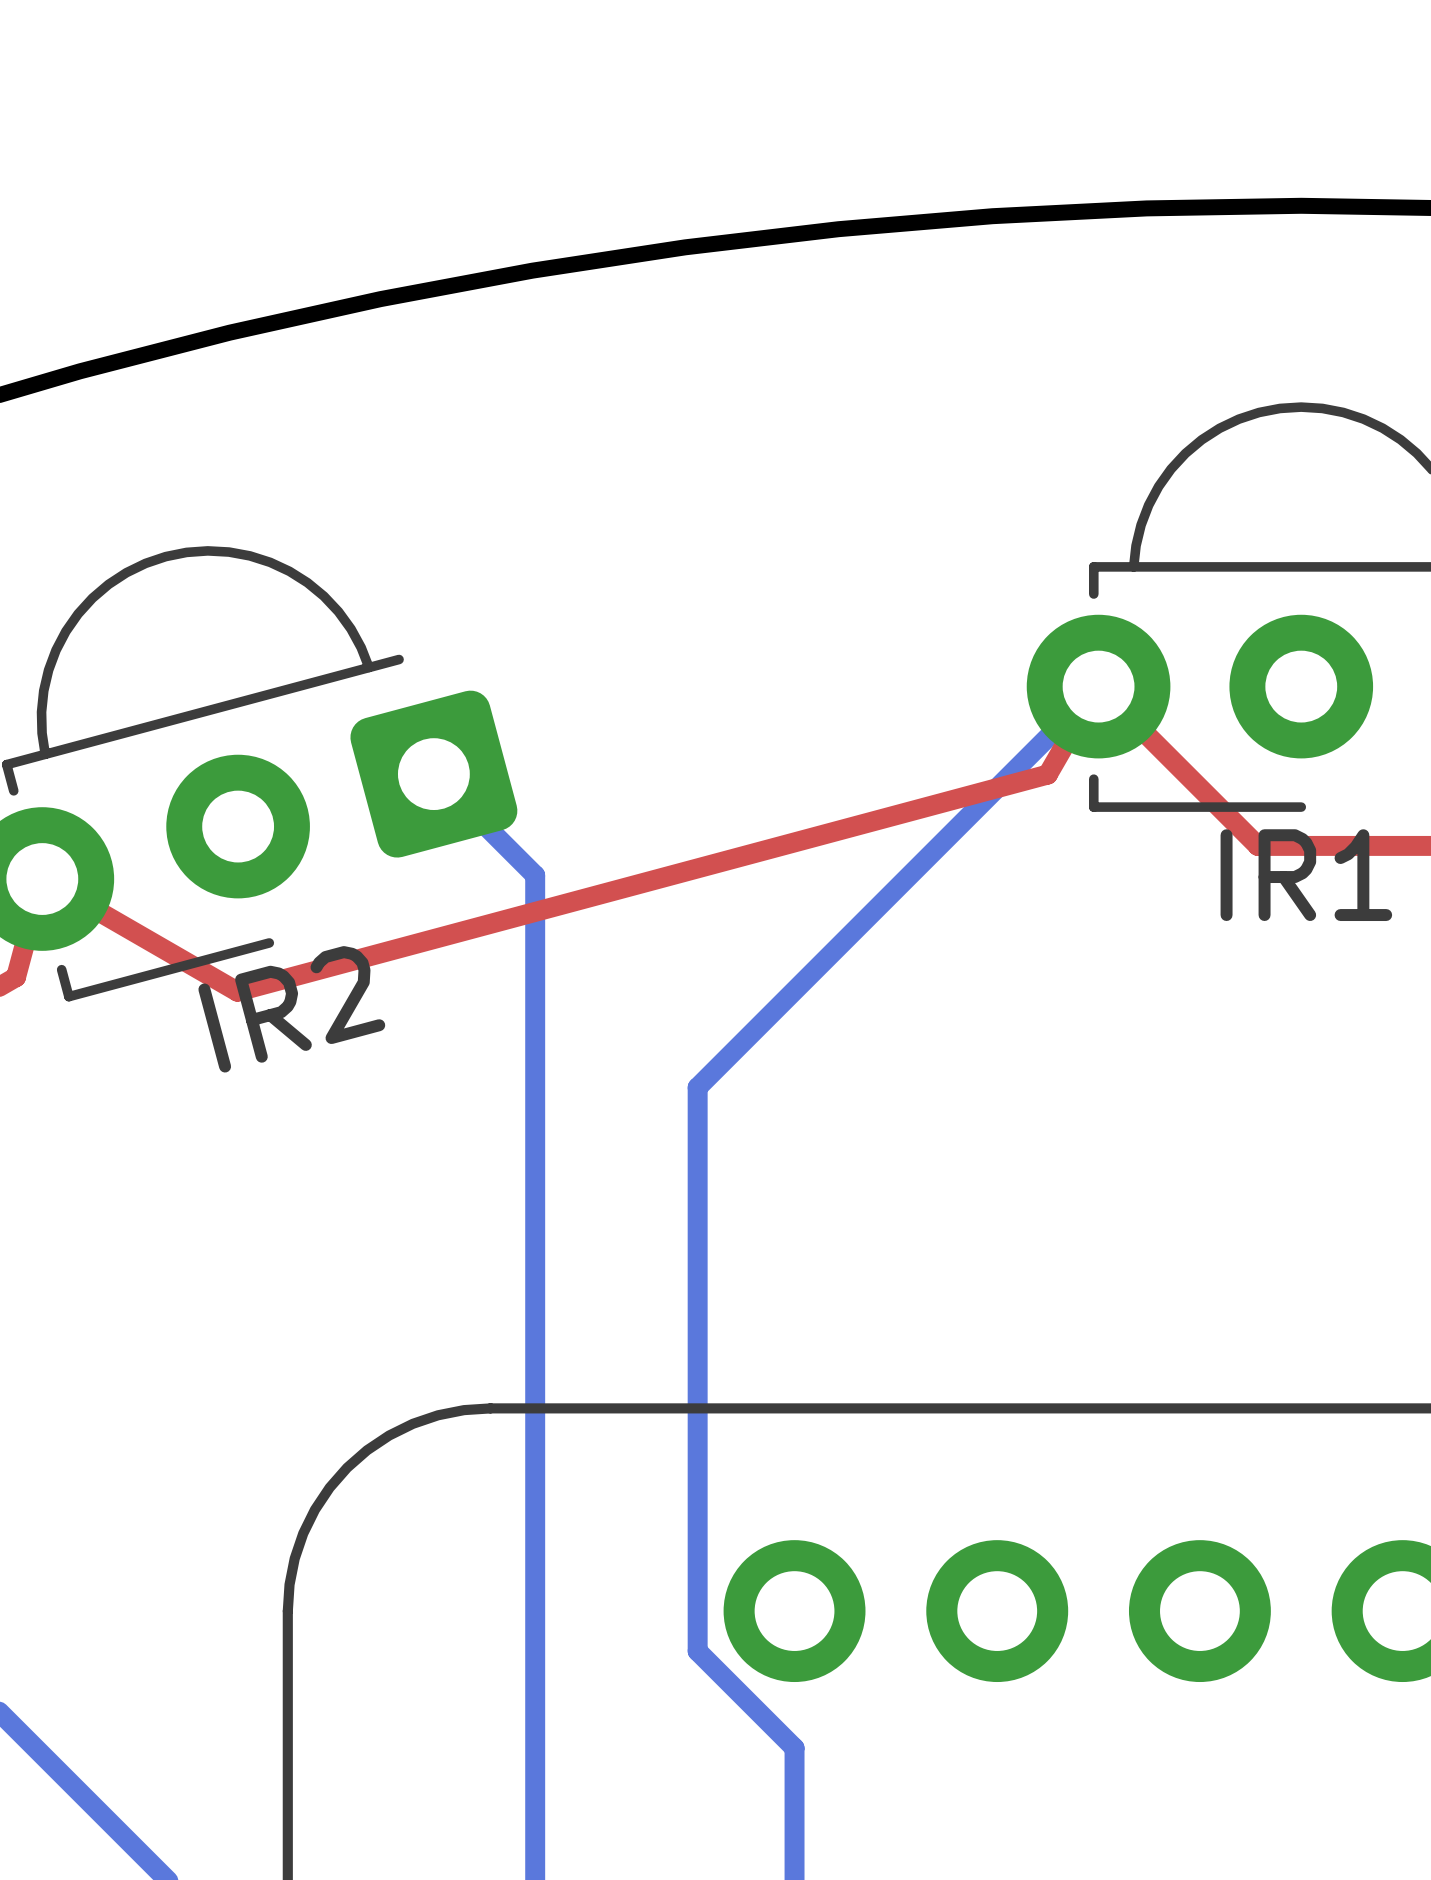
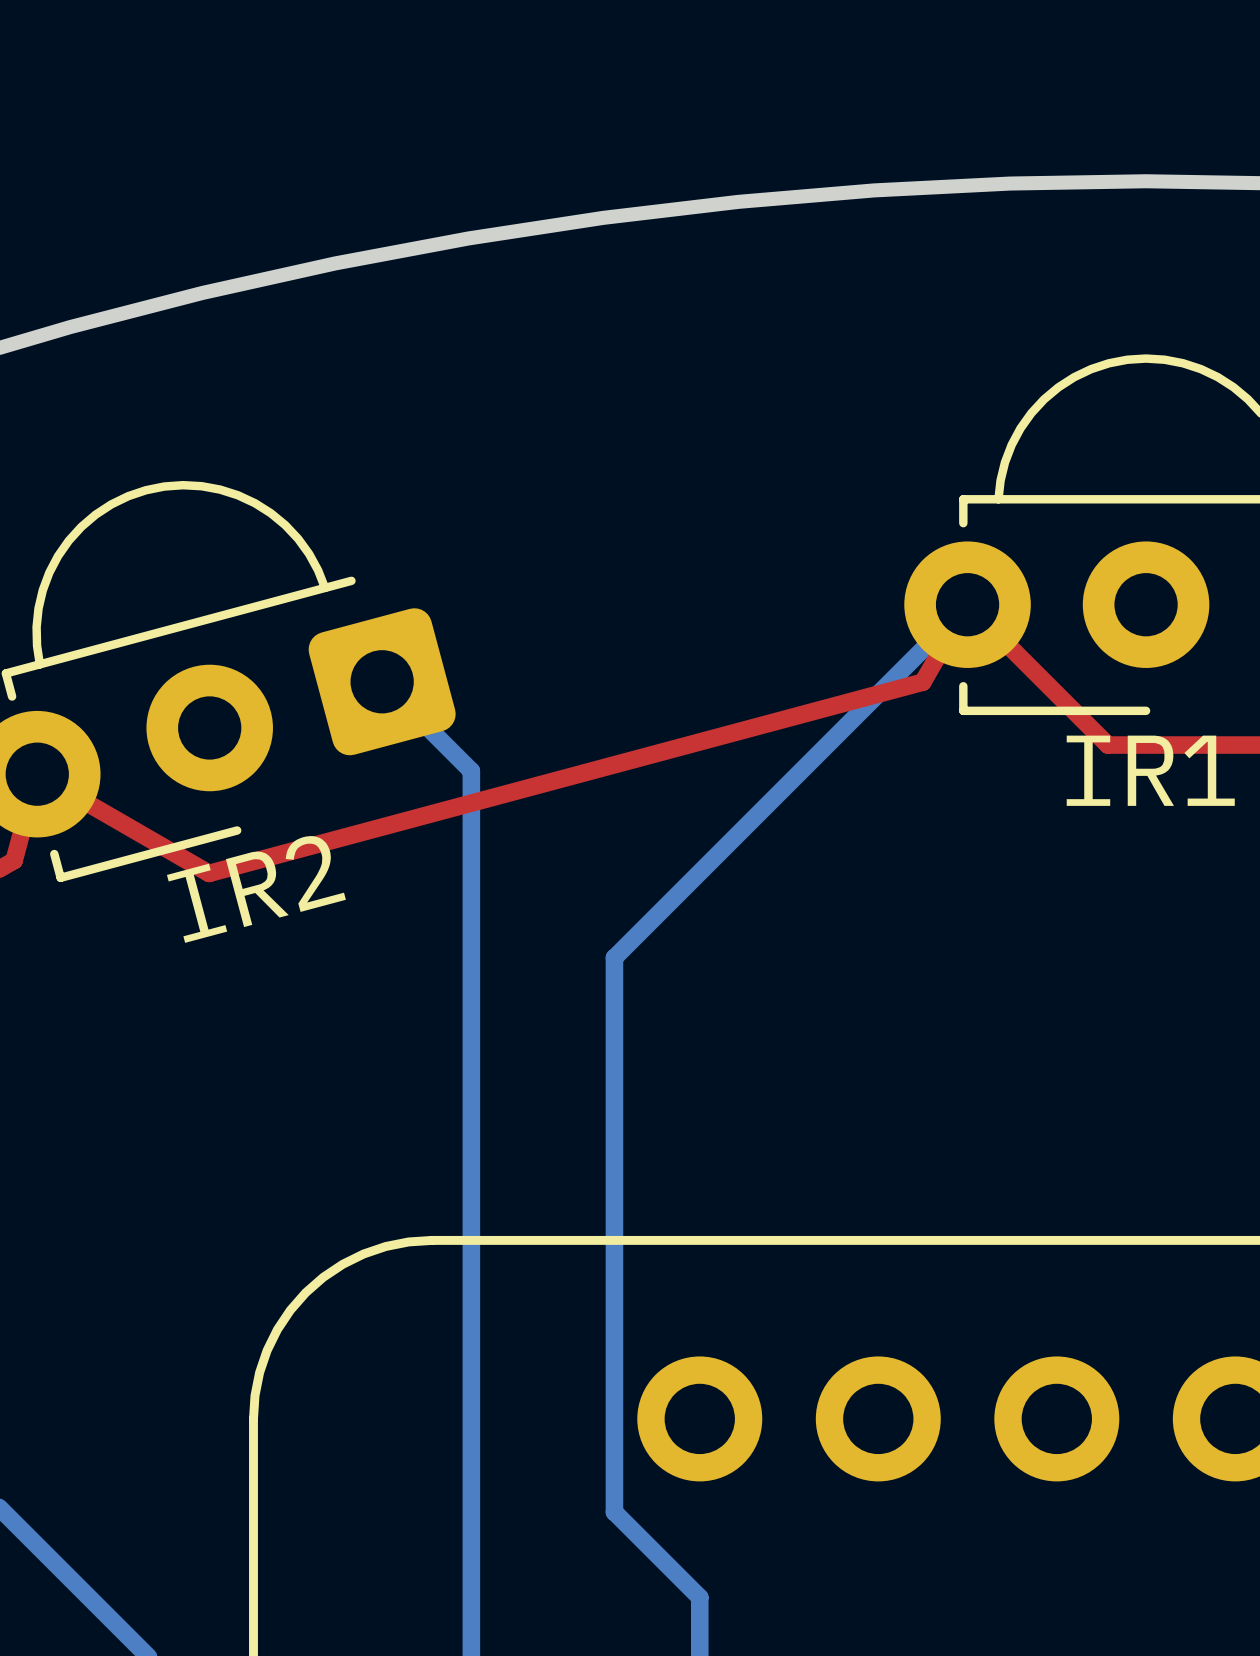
bottom track: (697, 1651) (794, 1748) (794, 1813) -> (614, 1454) (614, 1512) (699, 1597)

